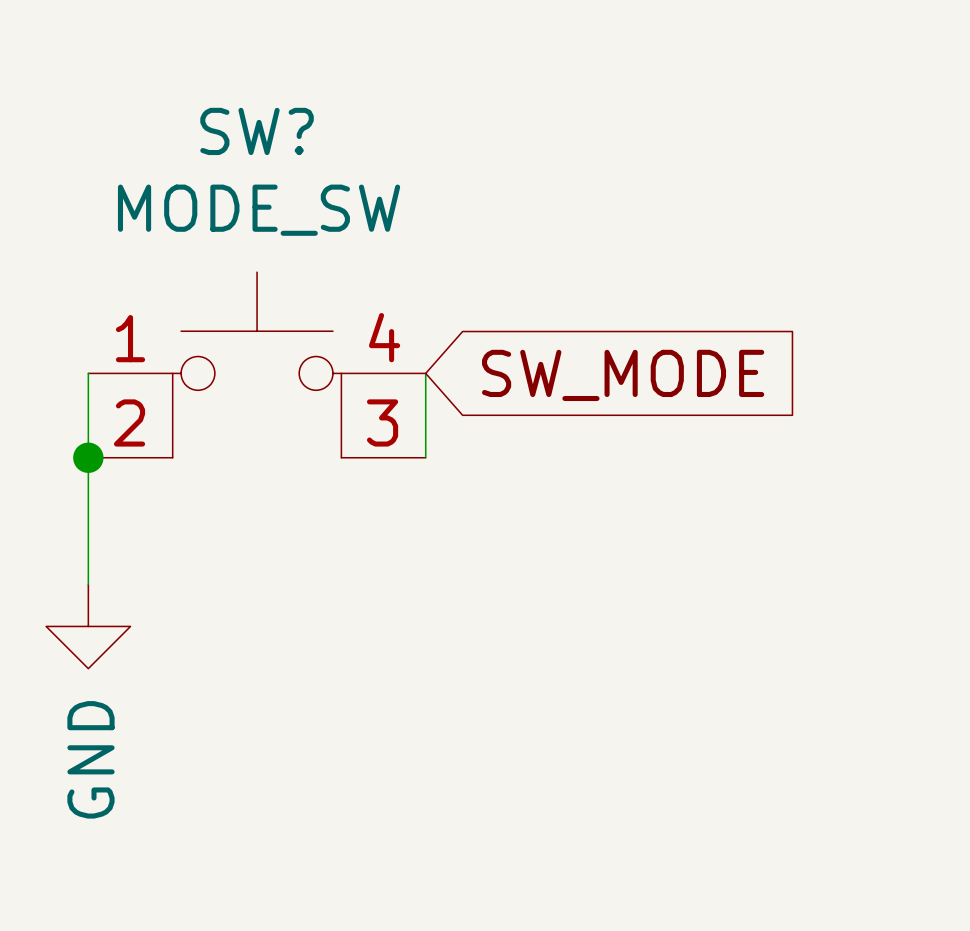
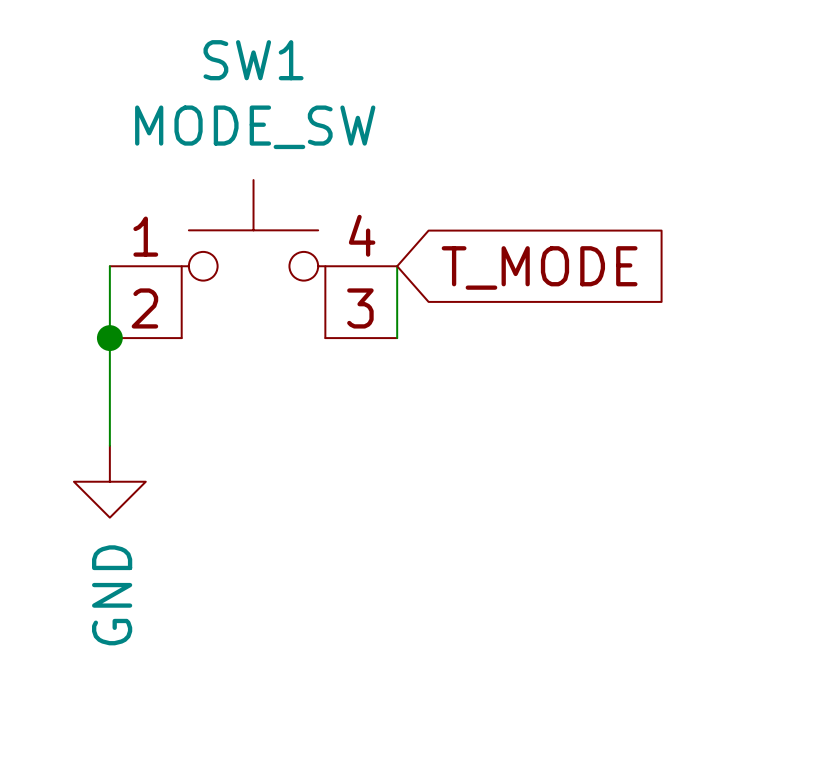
SW? name: SW? (257, 131) -> SW1 (253, 60)
global label: SW_MODE (623, 375) -> T_MODE (539, 267)

